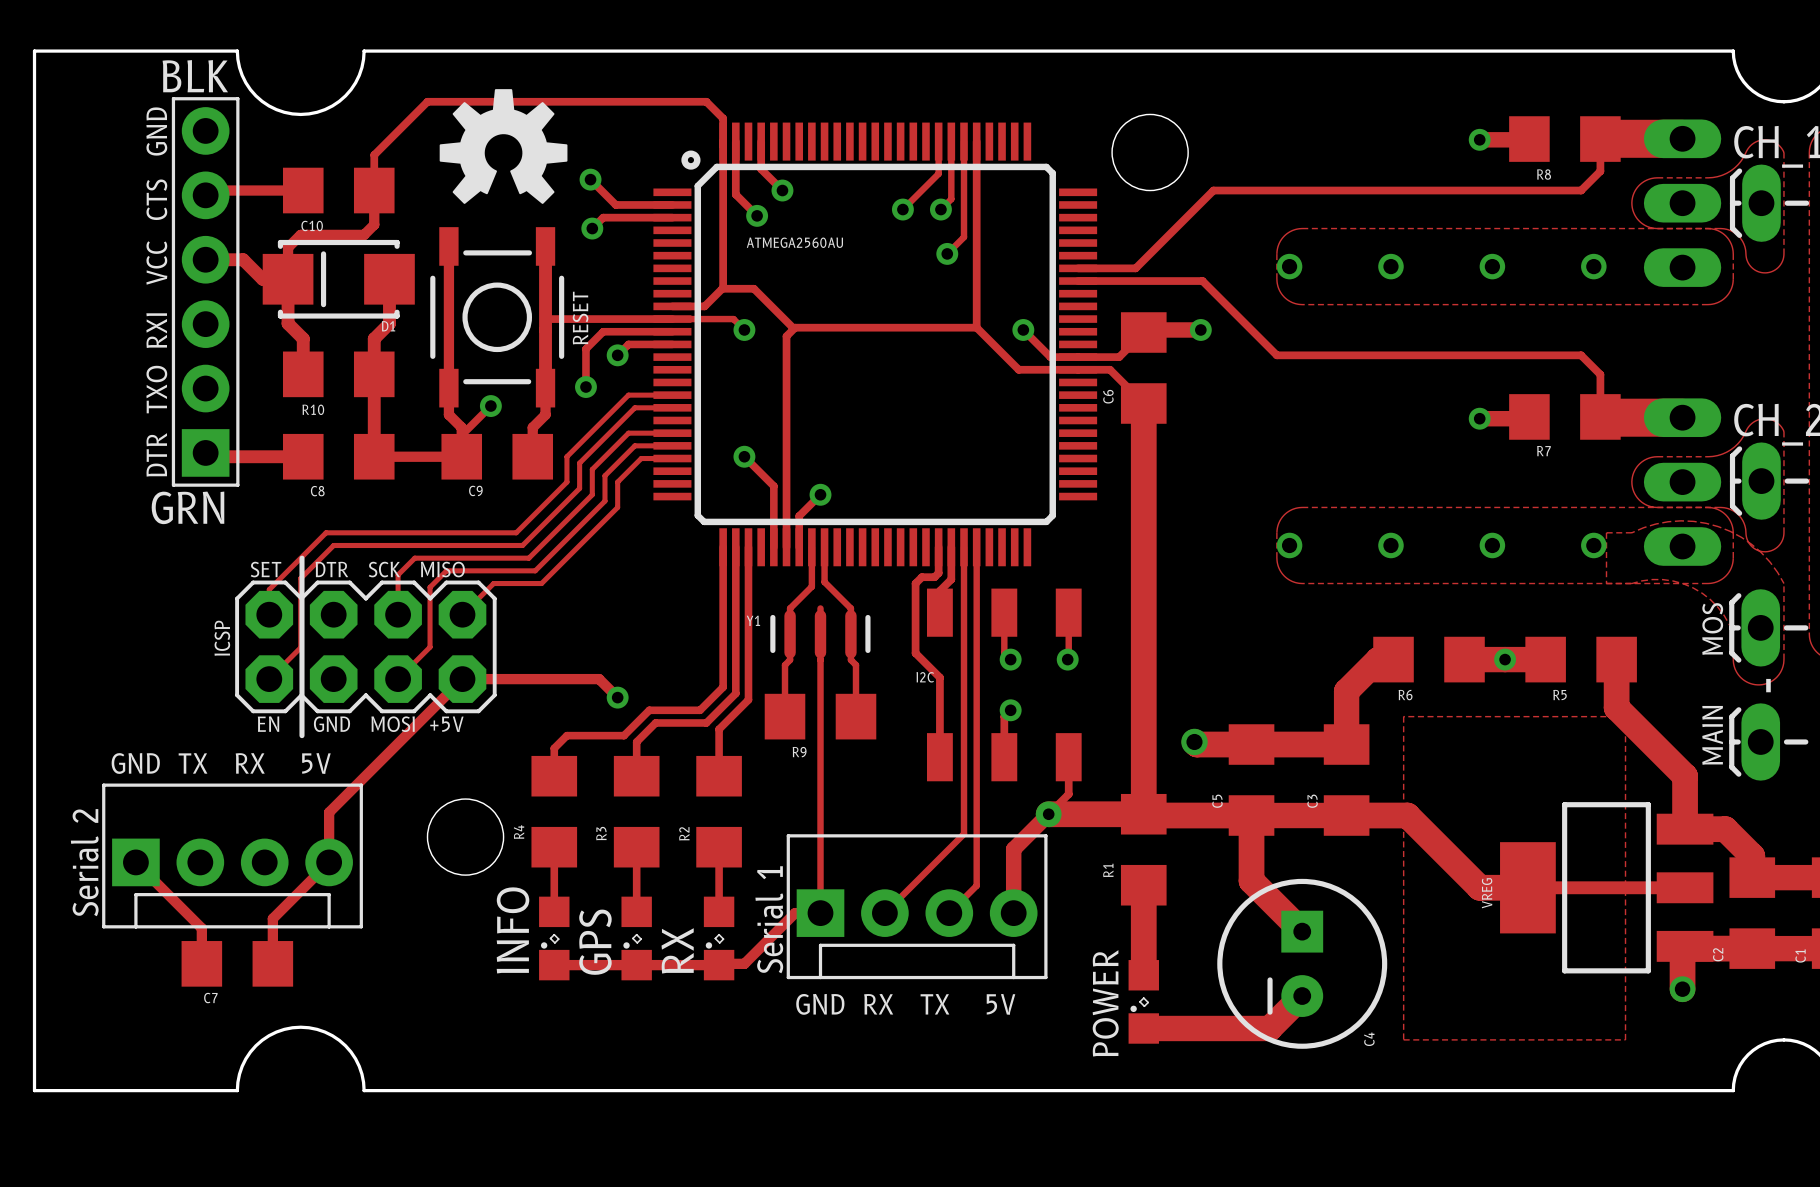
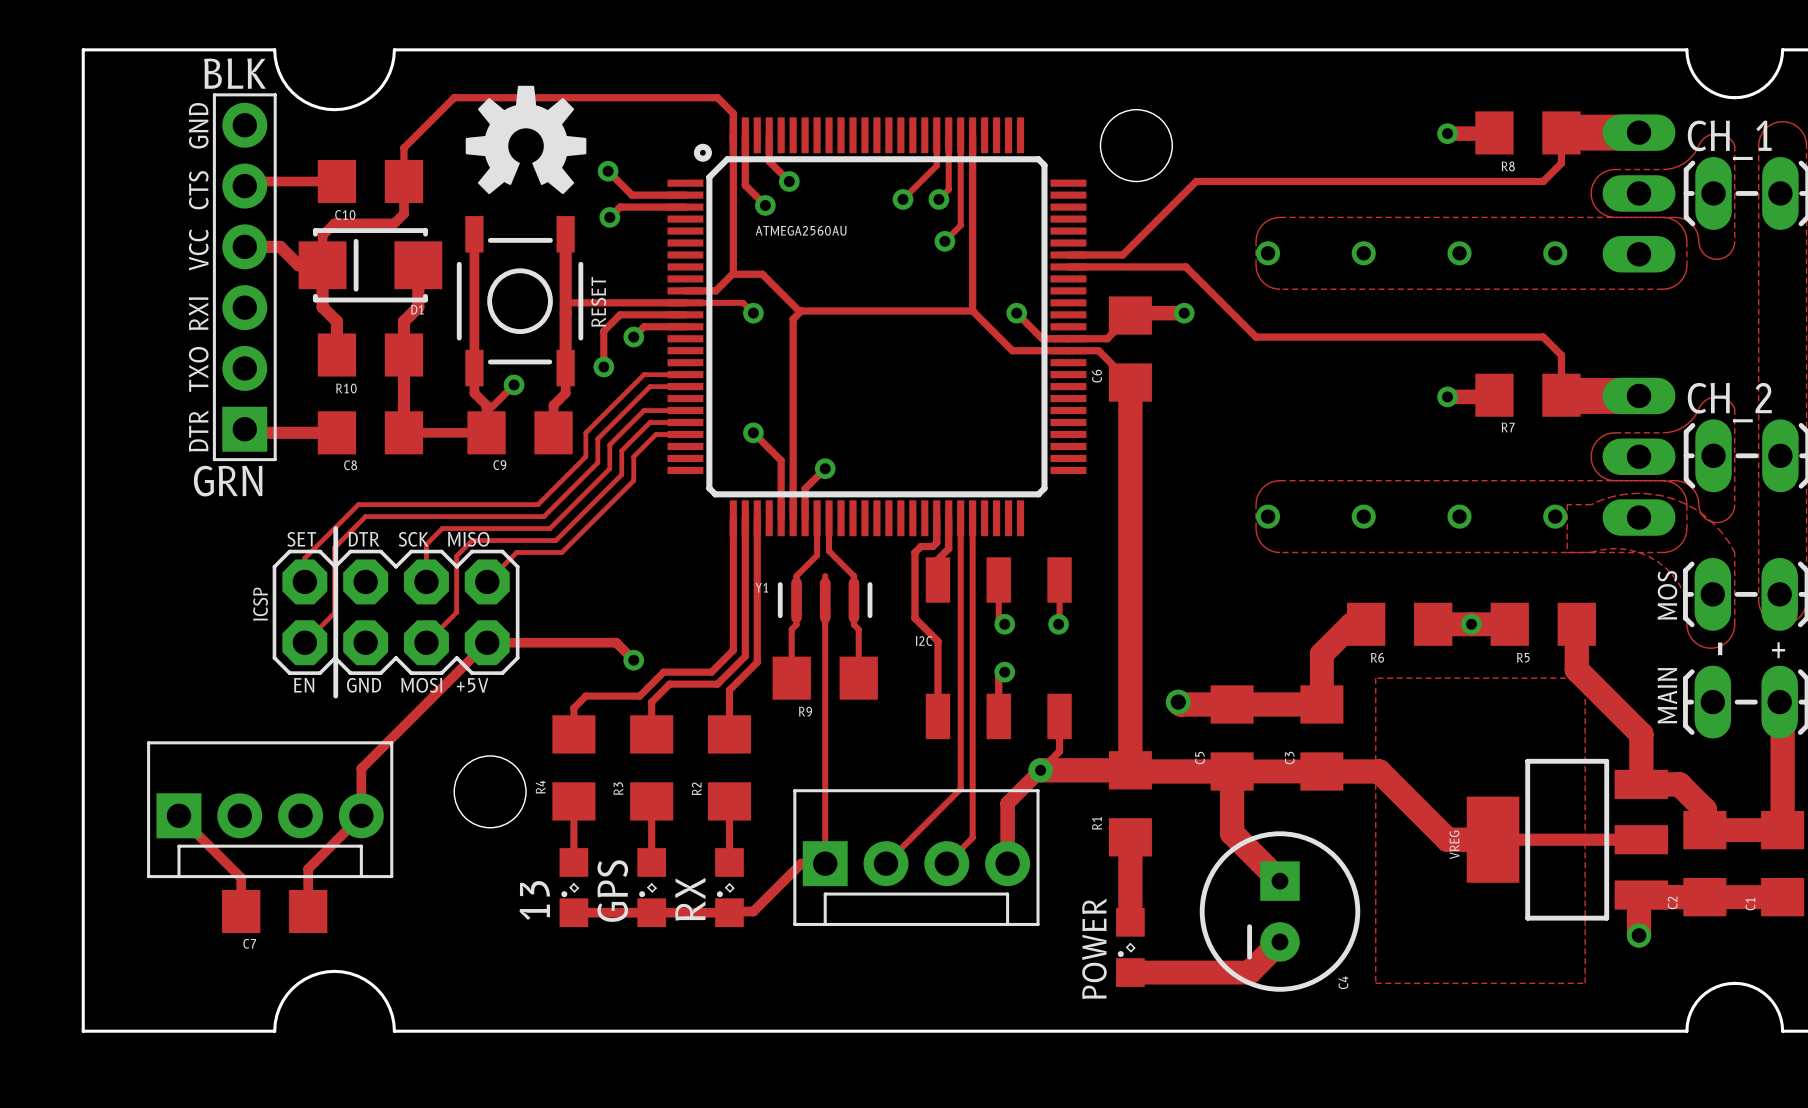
text: GND TX RX 5V (221, 763) -> none
text: Serial 2 (84, 862) -> none
text: Serial 1 (769, 919) -> none
INFO name: INFO (513, 930) -> 13 (534, 900)
text: GND RX TX 5V (905, 1004) -> none

